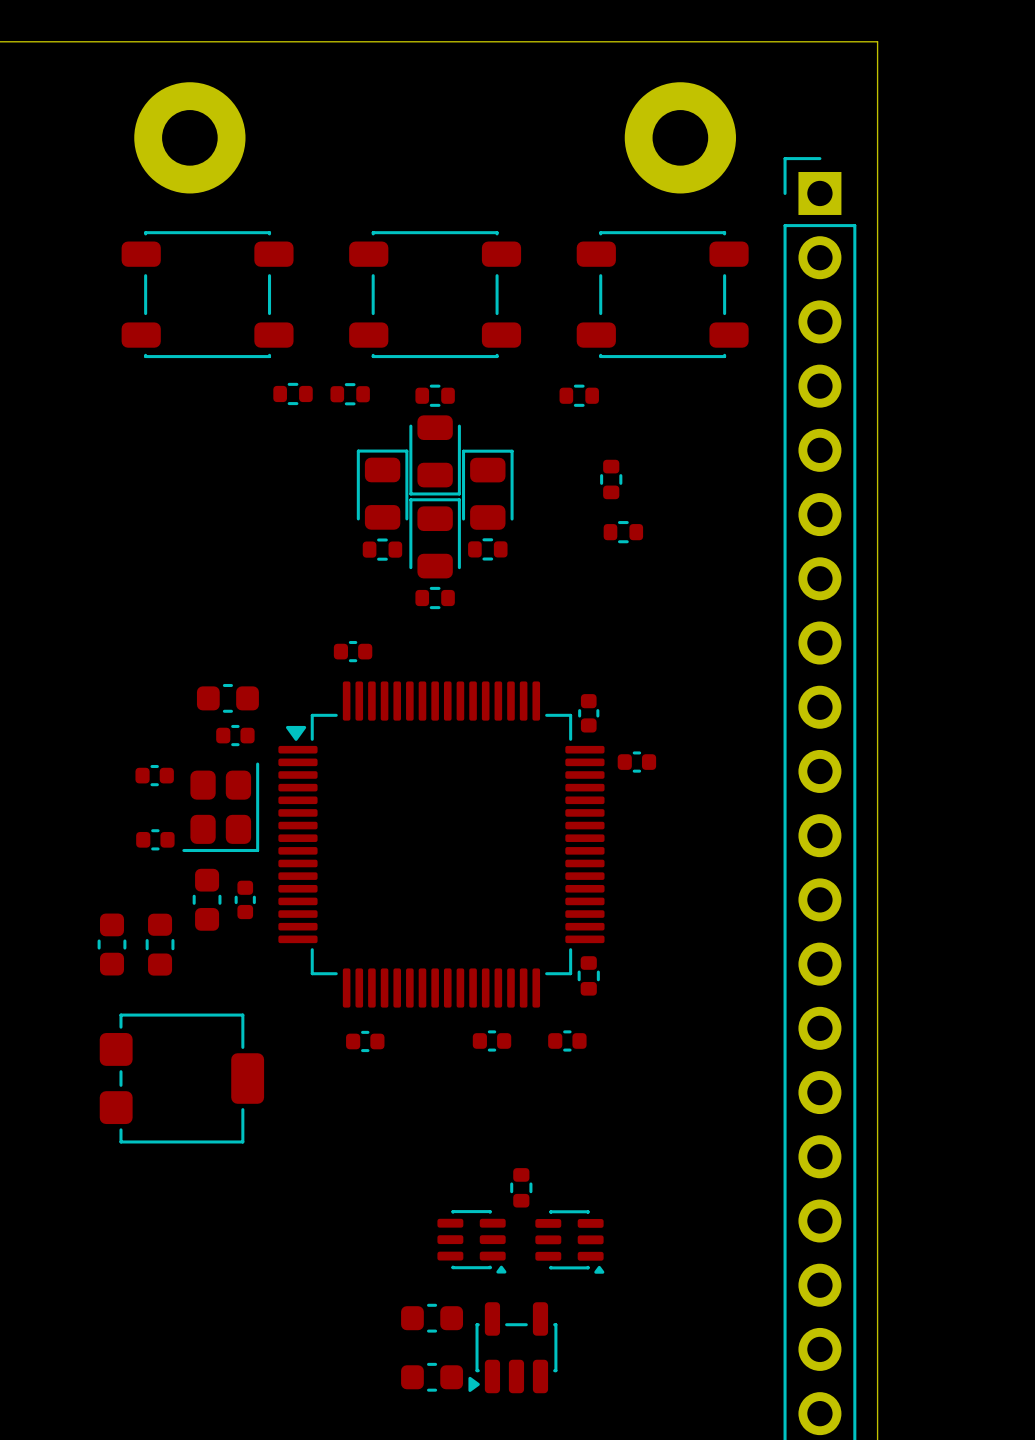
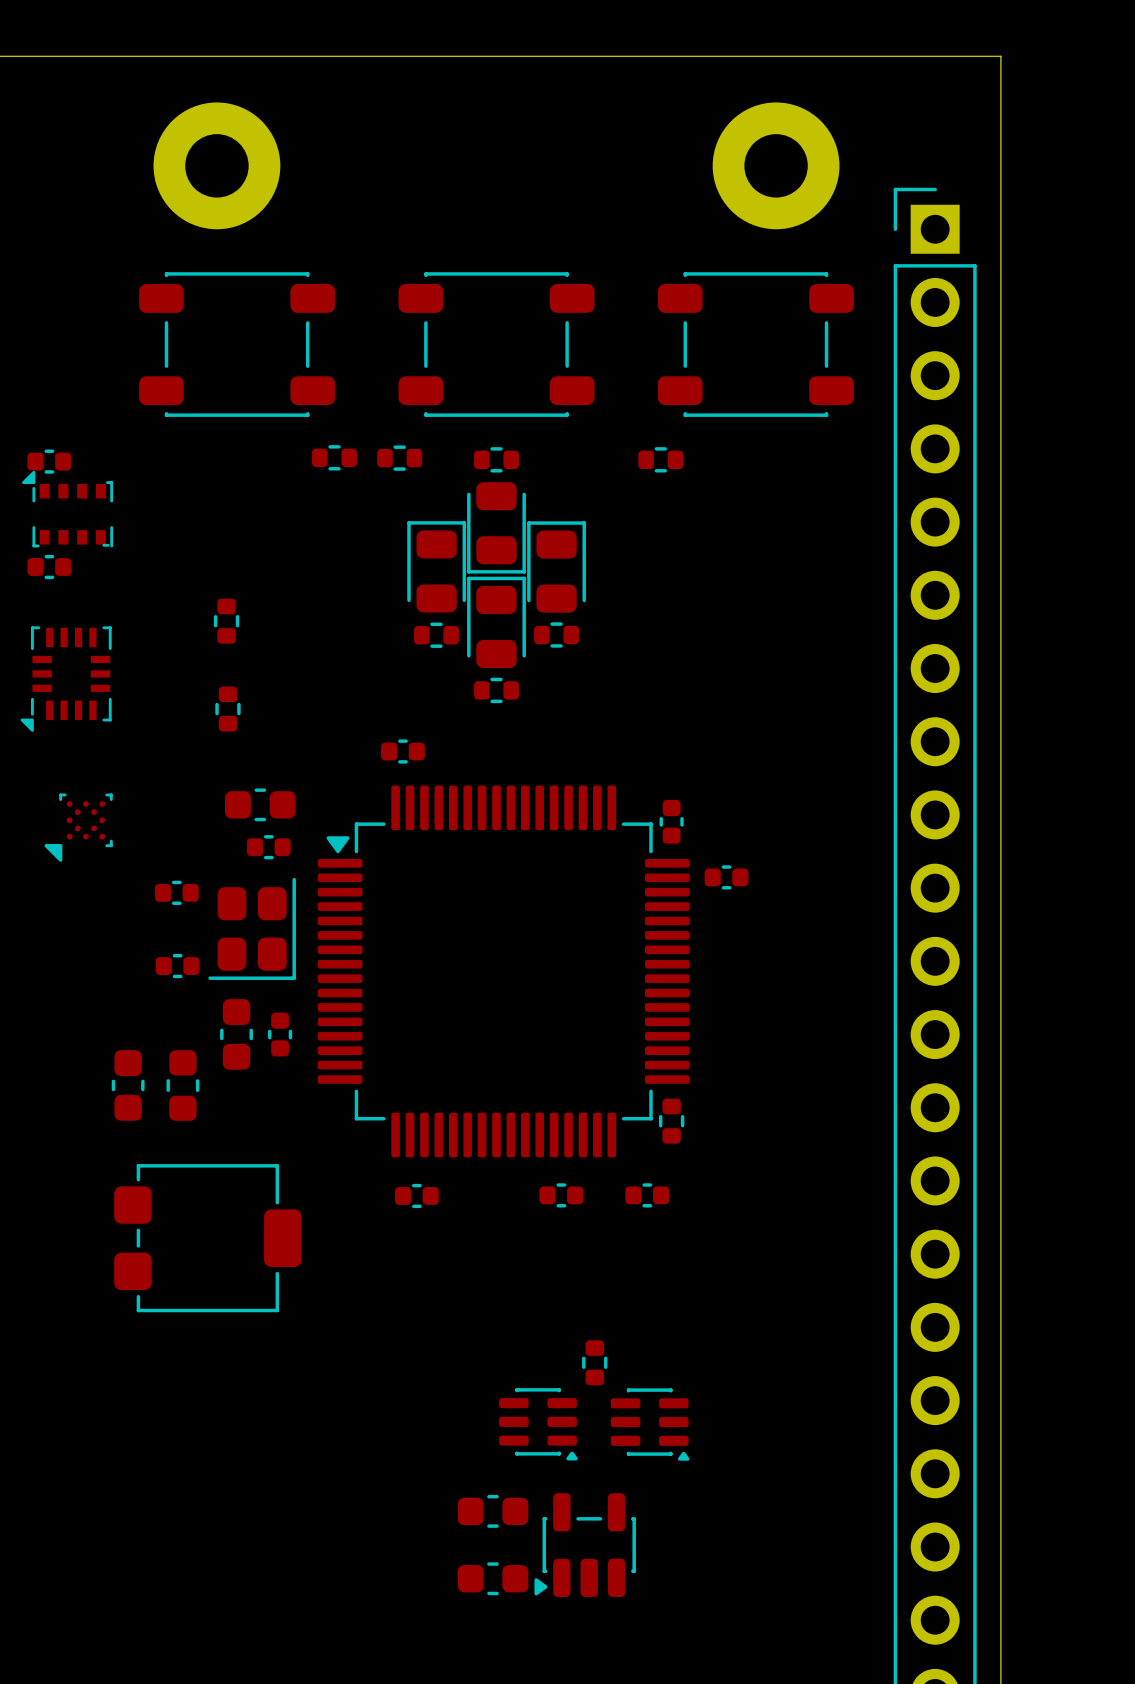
part: none -> (49, 461)
part: none -> (67, 509)
part: (611, 479) -> none
part: none -> (49, 567)
part: (623, 532) -> none
part: none -> (226, 621)
part: none -> (66, 679)
part: none -> (227, 709)
part: none -> (78, 827)

